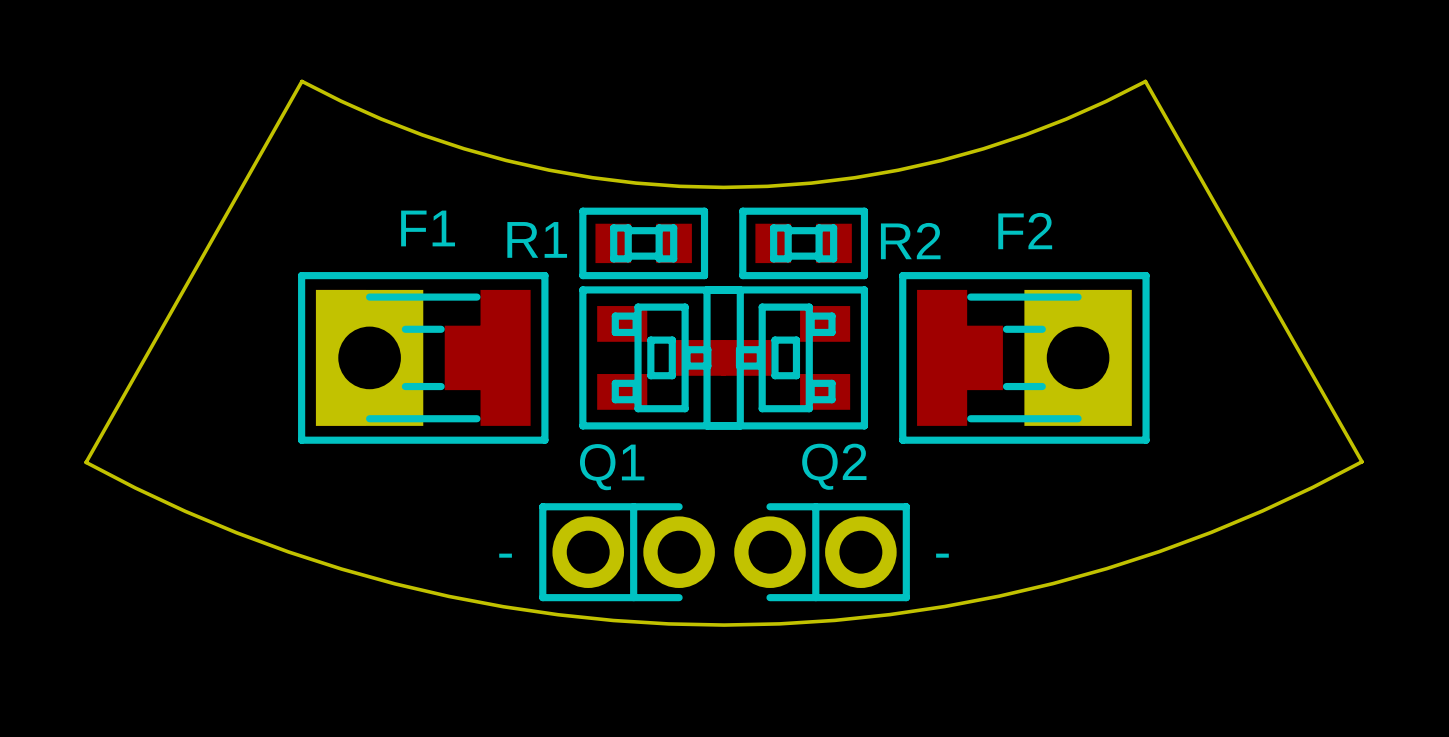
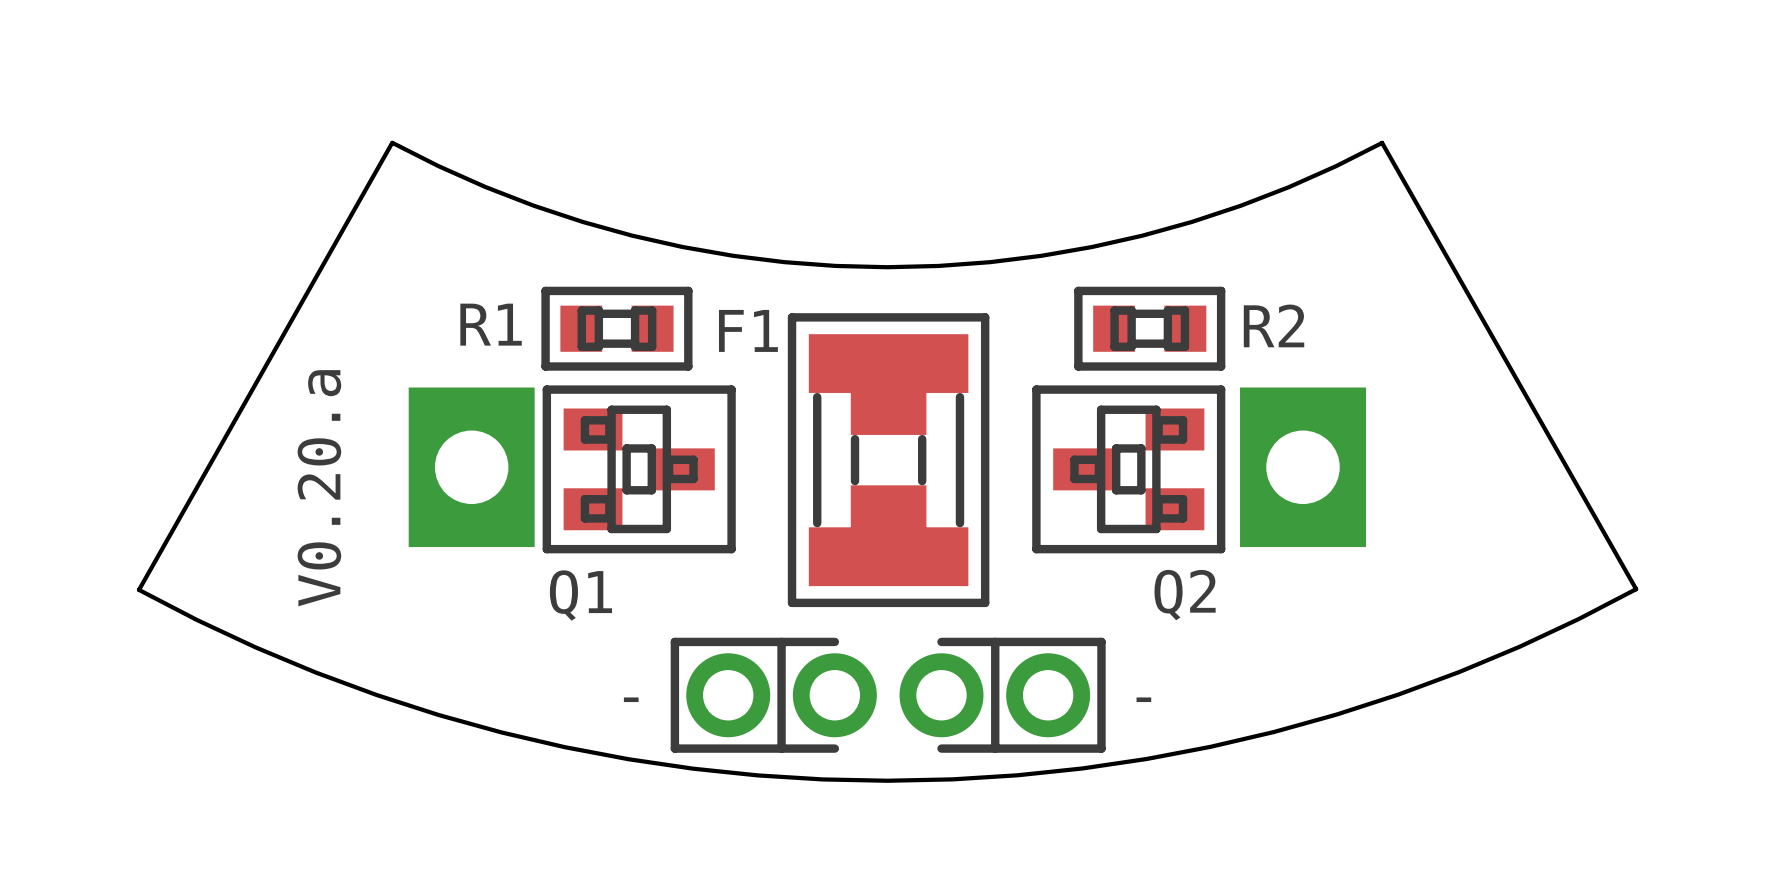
F1 name position: F1 (428, 228) -> F1 (748, 330)
R1 position: (643, 243) -> (616, 328)
R2 position: (803, 243) -> (1149, 328)
F1 rotation: 0° (423, 357) -> 90° clockwise (888, 460)
F1 position: (423, 357) -> (888, 460)
Q1 position: (661, 357) -> (639, 469)
Q2 position: (785, 357) -> (1128, 469)
F2: (1024, 357) -> none
text: none -> V0.20.a (319, 488)

